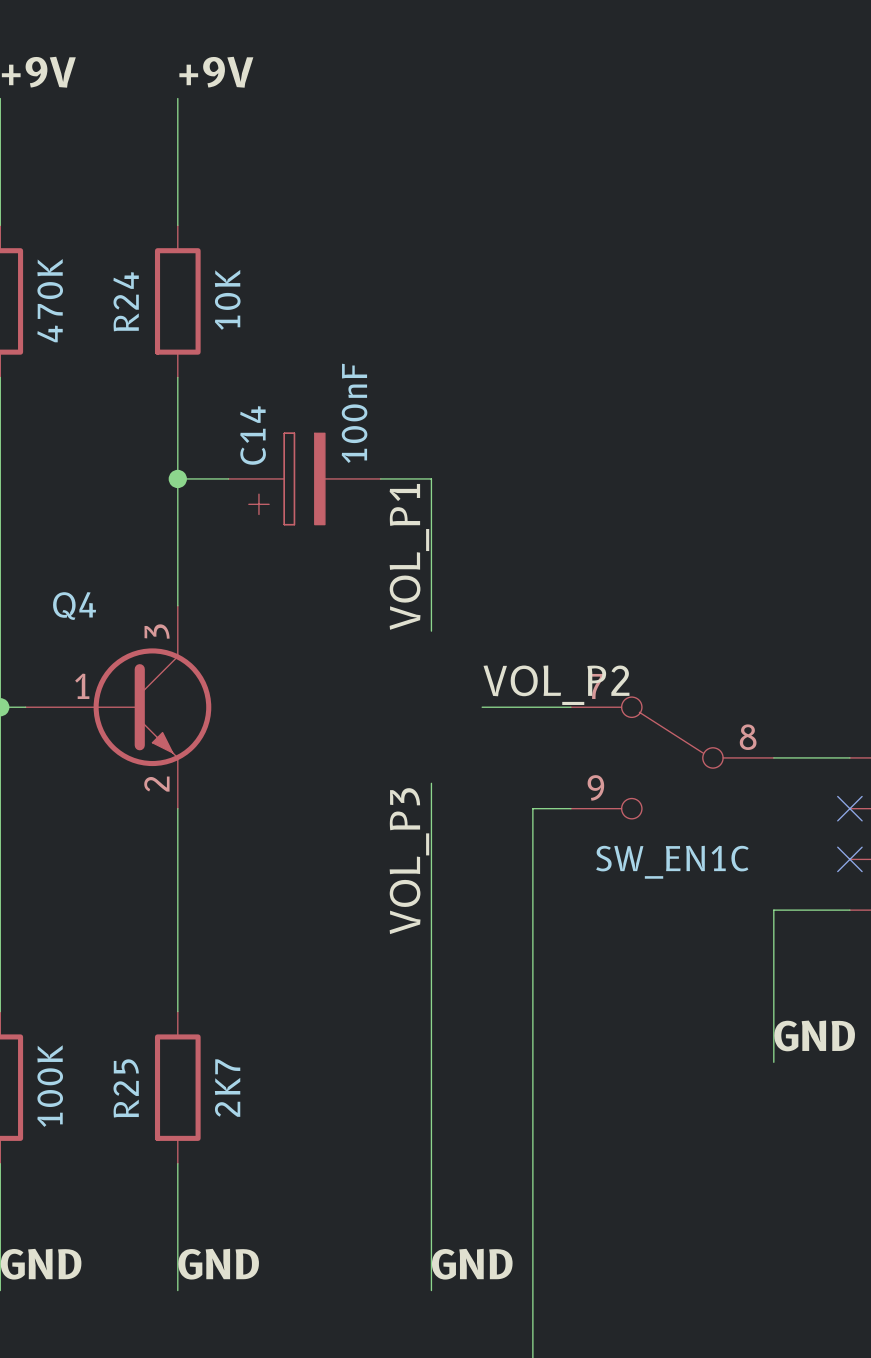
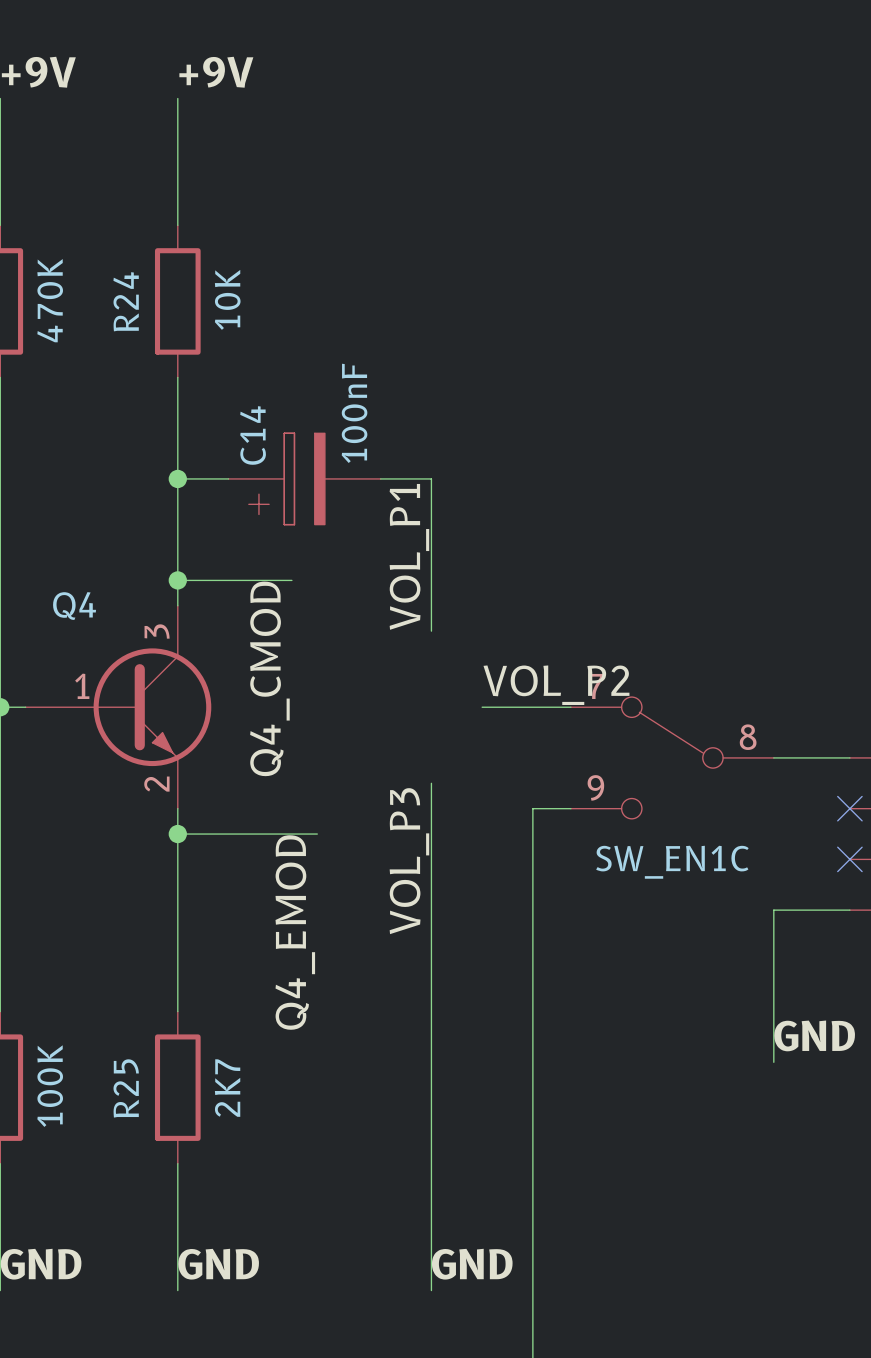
wire: none -> (177, 580) (291, 580)
junction: none -> (177, 580)
label: none -> Q4_CMOD (269, 678)
wire: none -> (177, 834) (317, 834)
junction: none -> (177, 834)
label: none -> Q4_EMOD (295, 932)

